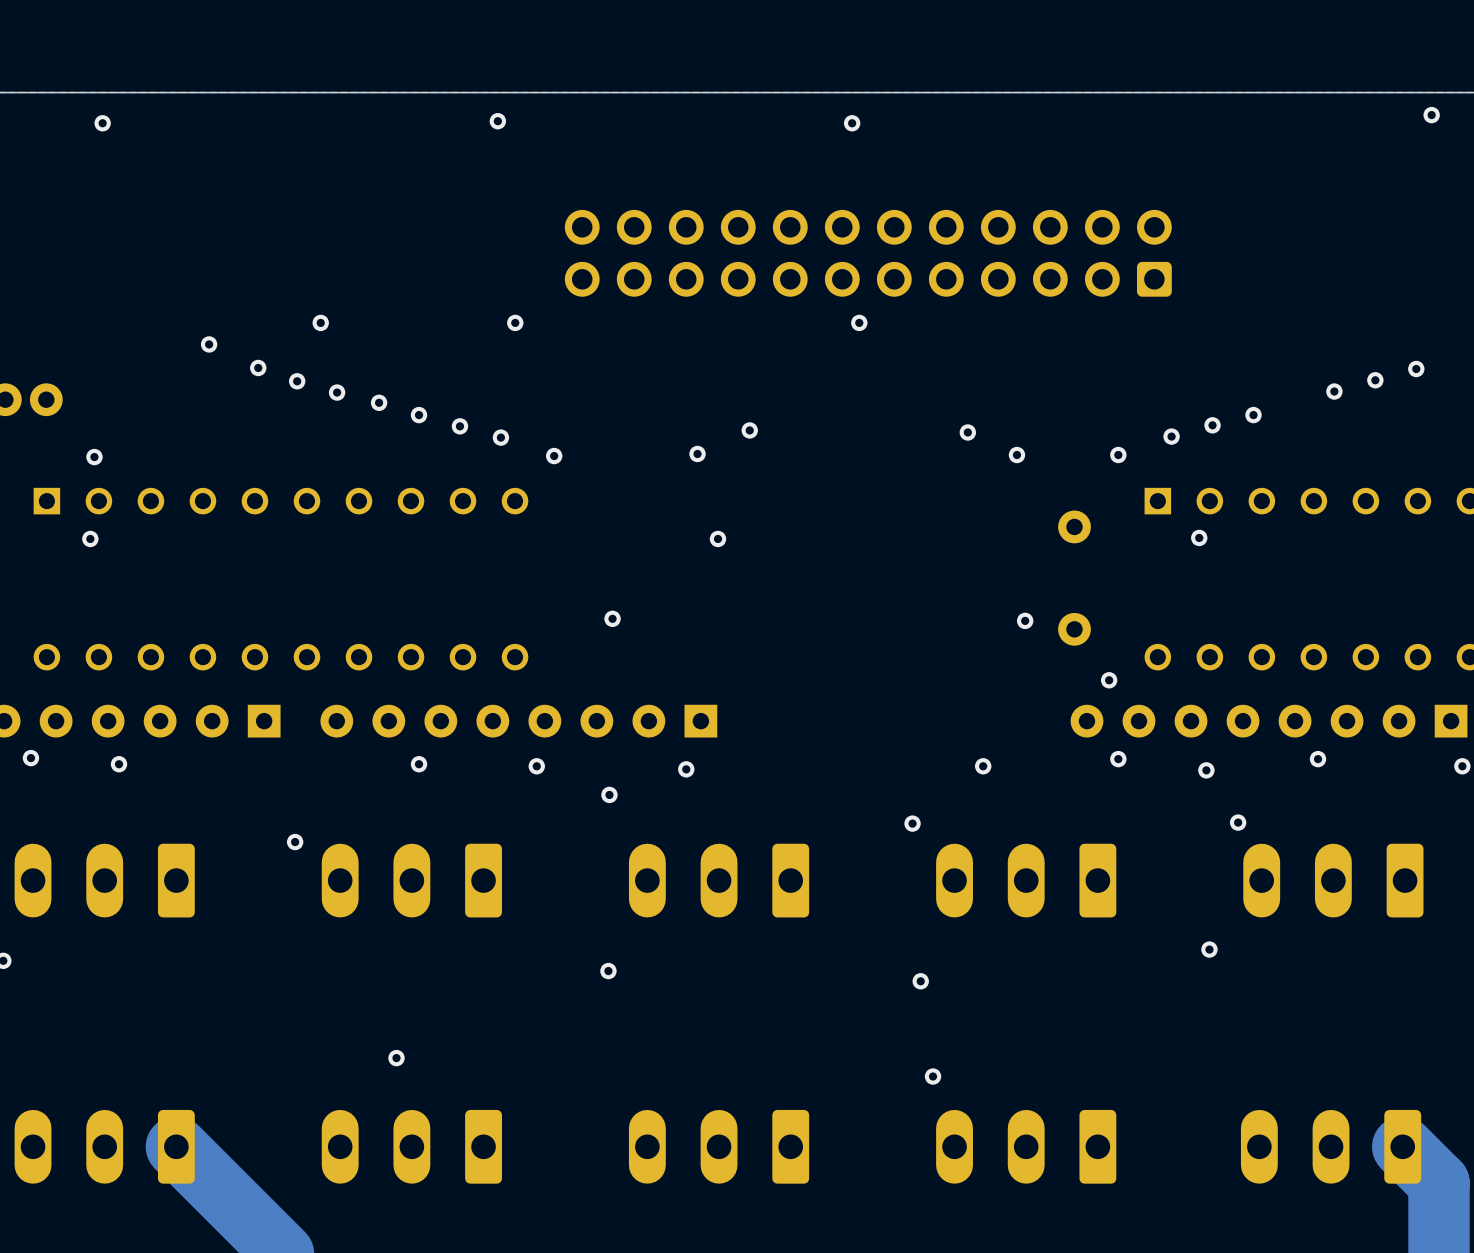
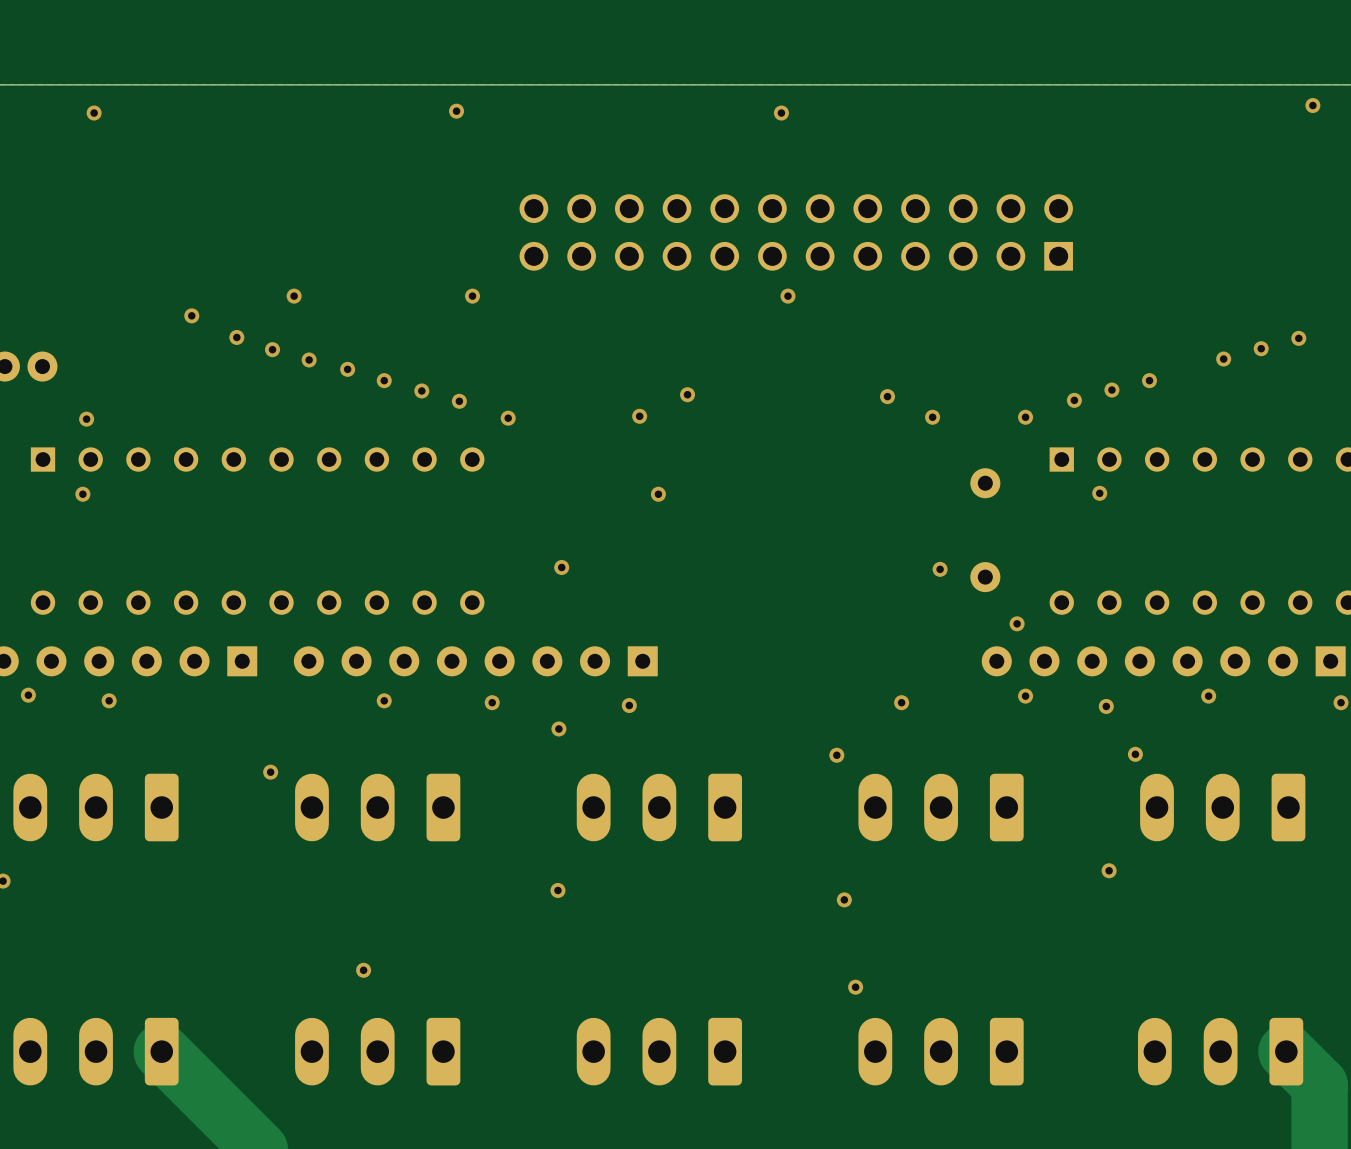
part footprint: [564, 209, 1172, 297] -> [519, 194, 1073, 271]

